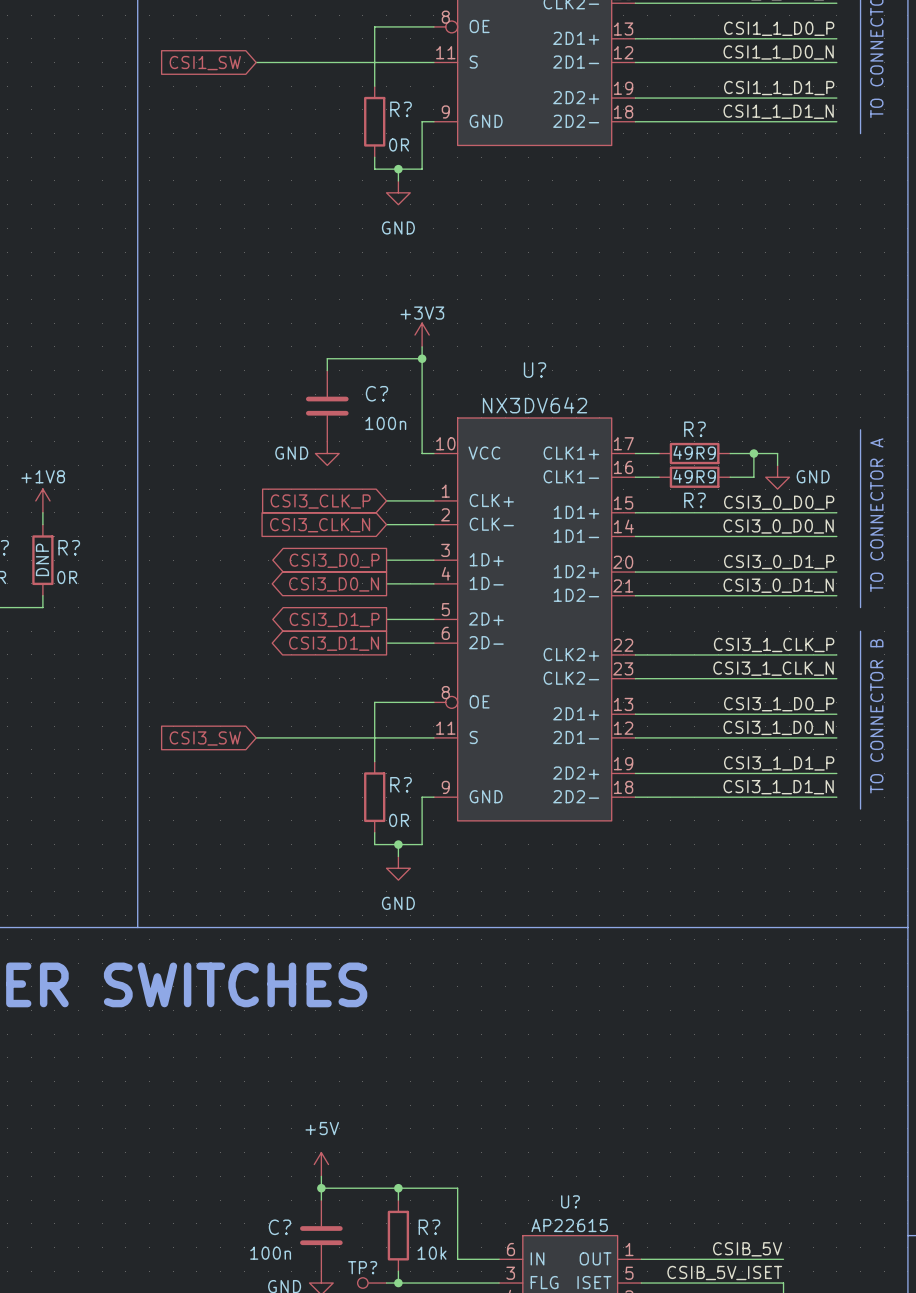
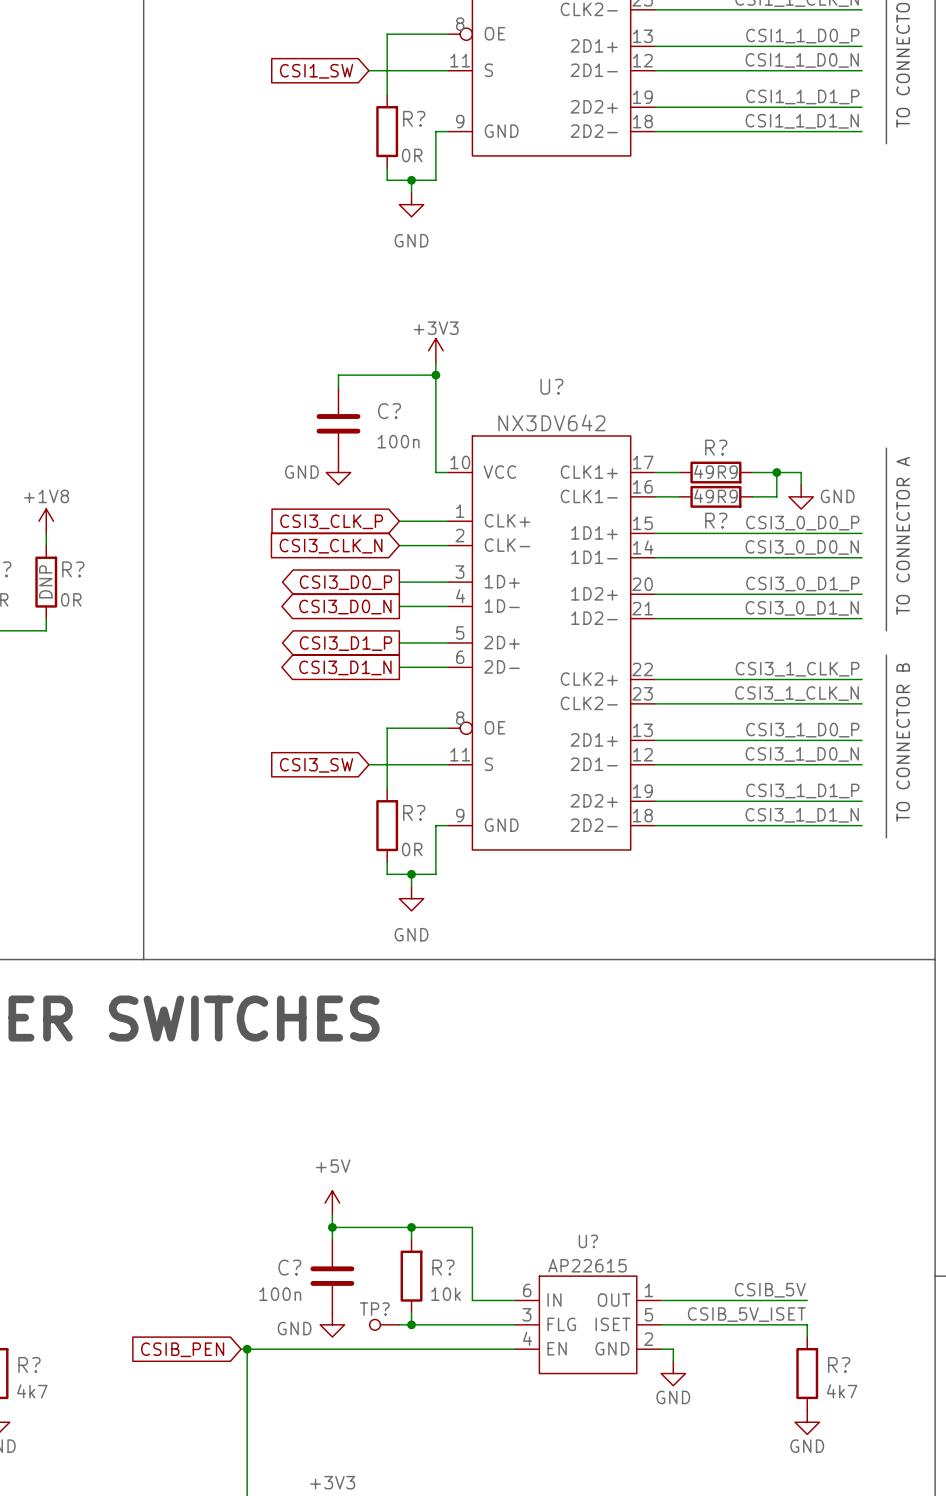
wire: (256, 62) (356, 62) -> none
global label position: CSI1_SW (205, 63) -> CSI1_SW (316, 71)
wire: (256, 737) (356, 737) -> none
global label position: CSI3_SW (205, 738) -> CSI3_SW (316, 765)

